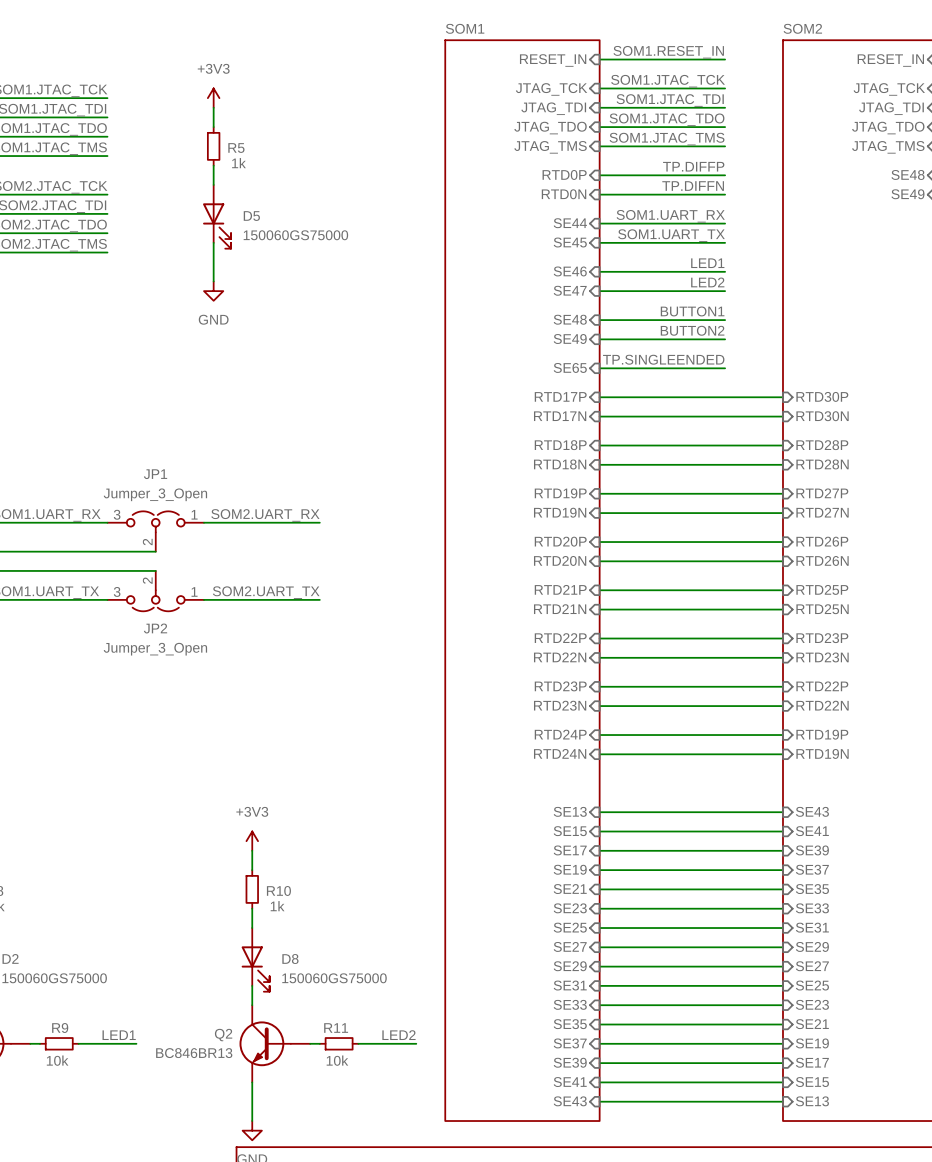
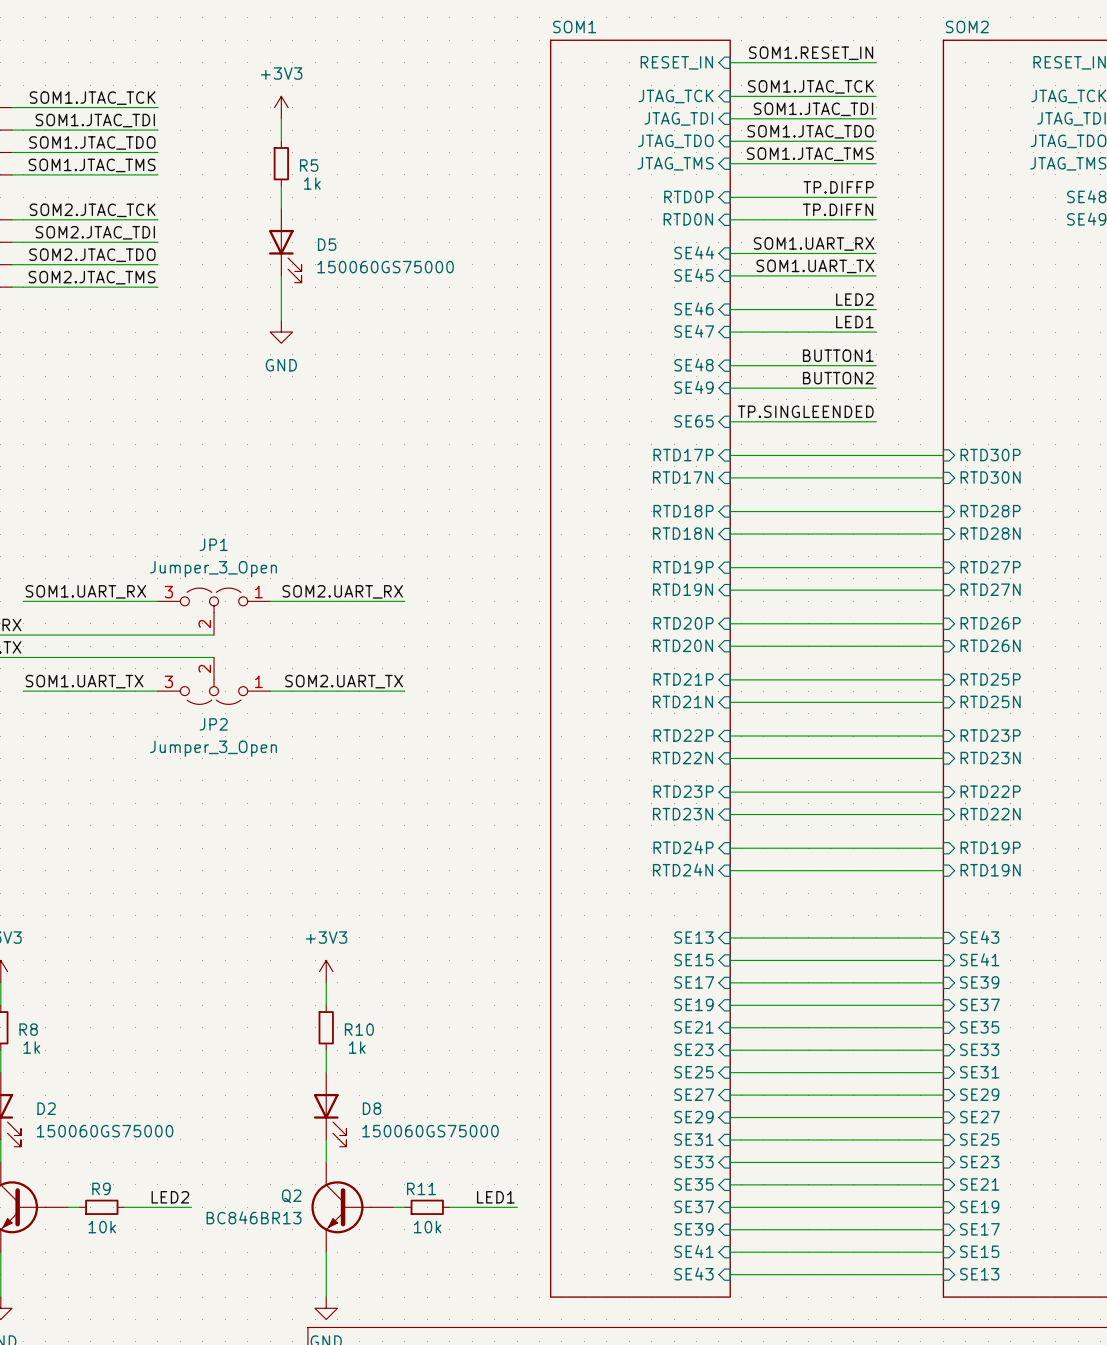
label: LED1 (707, 263) -> LED2 (854, 299)
label: LED2 (707, 282) -> LED1 (854, 322)
label: LED1 (119, 1035) -> LED2 (170, 1197)
label: LED2 (398, 1035) -> LED1 (495, 1197)

